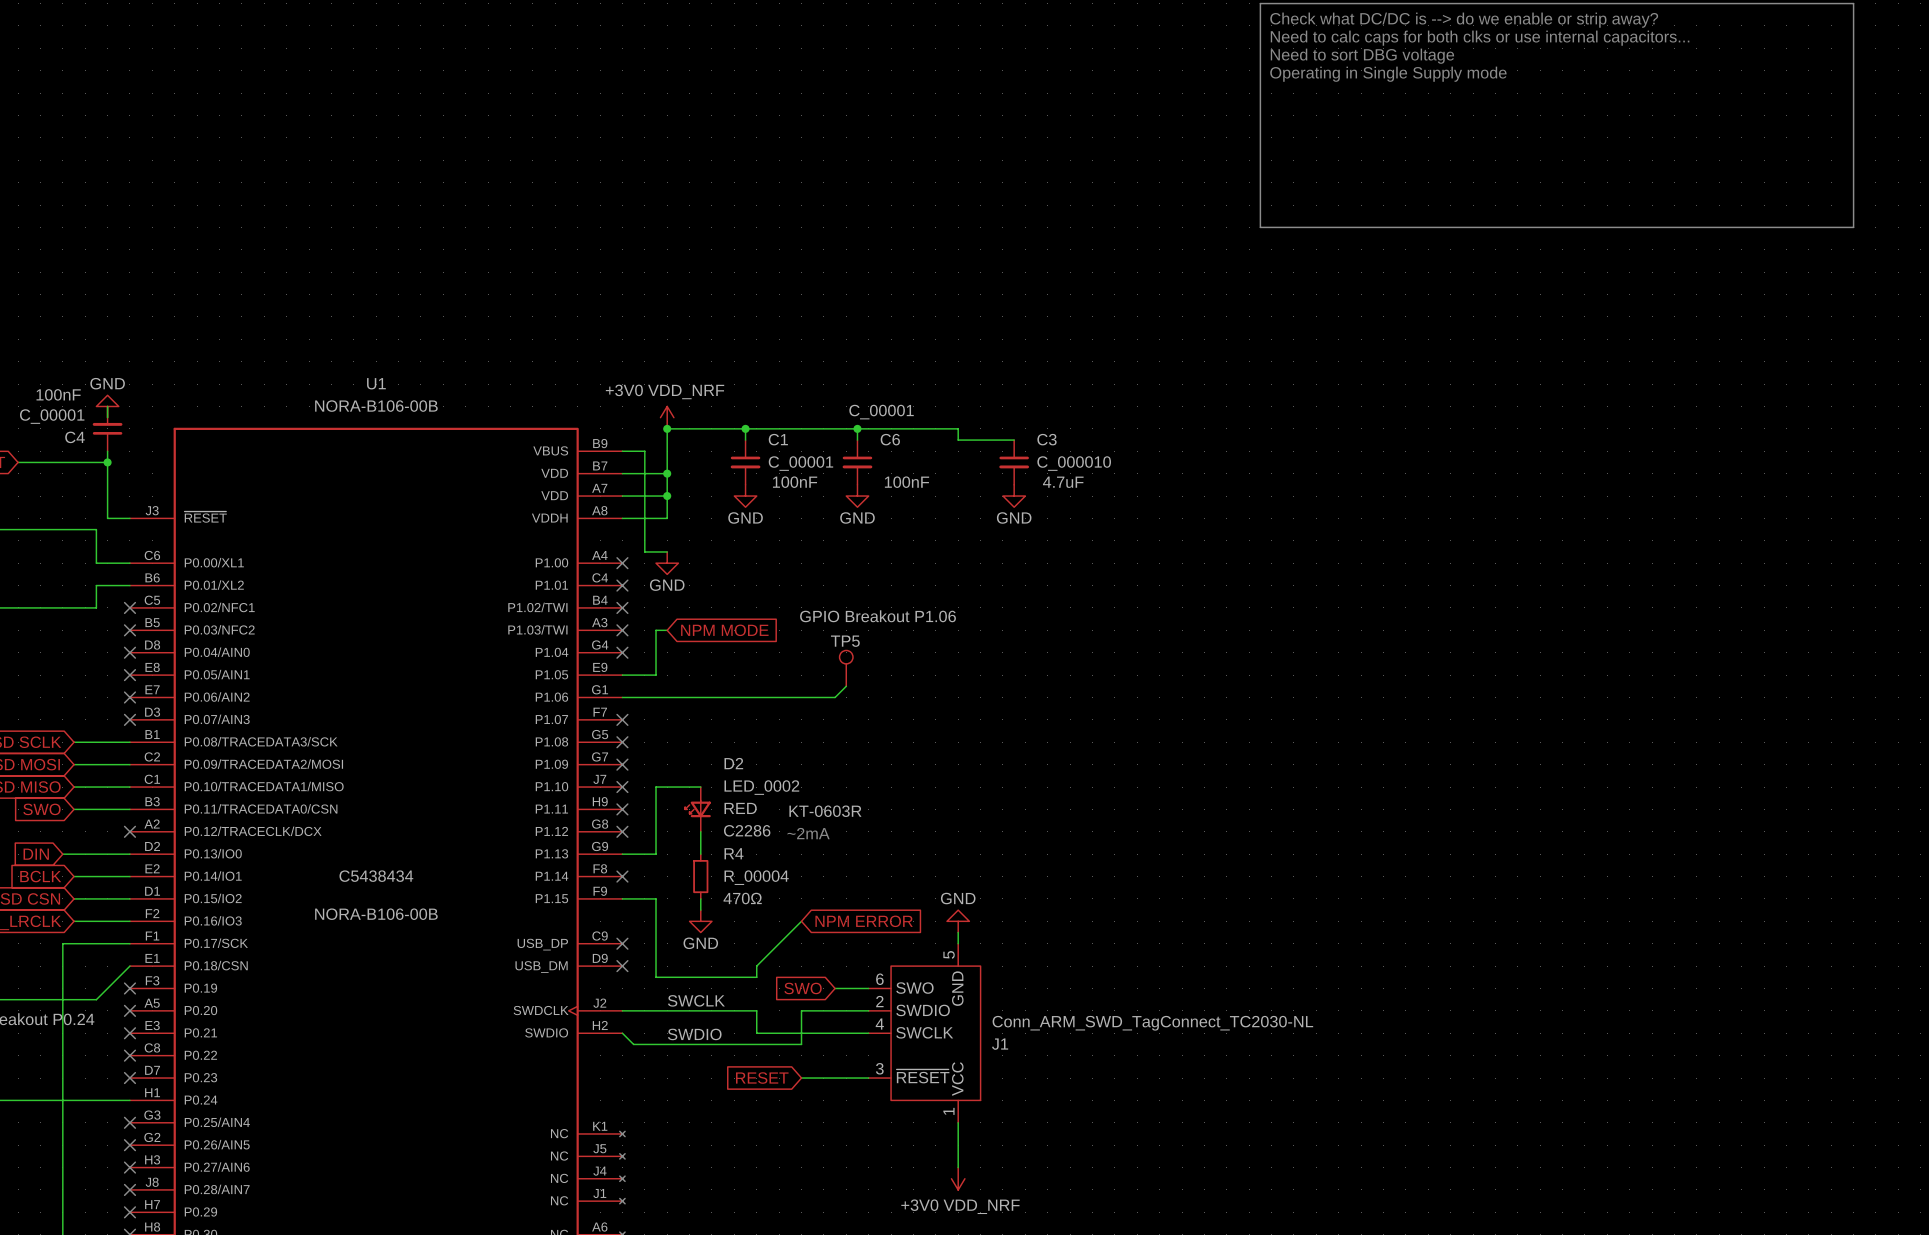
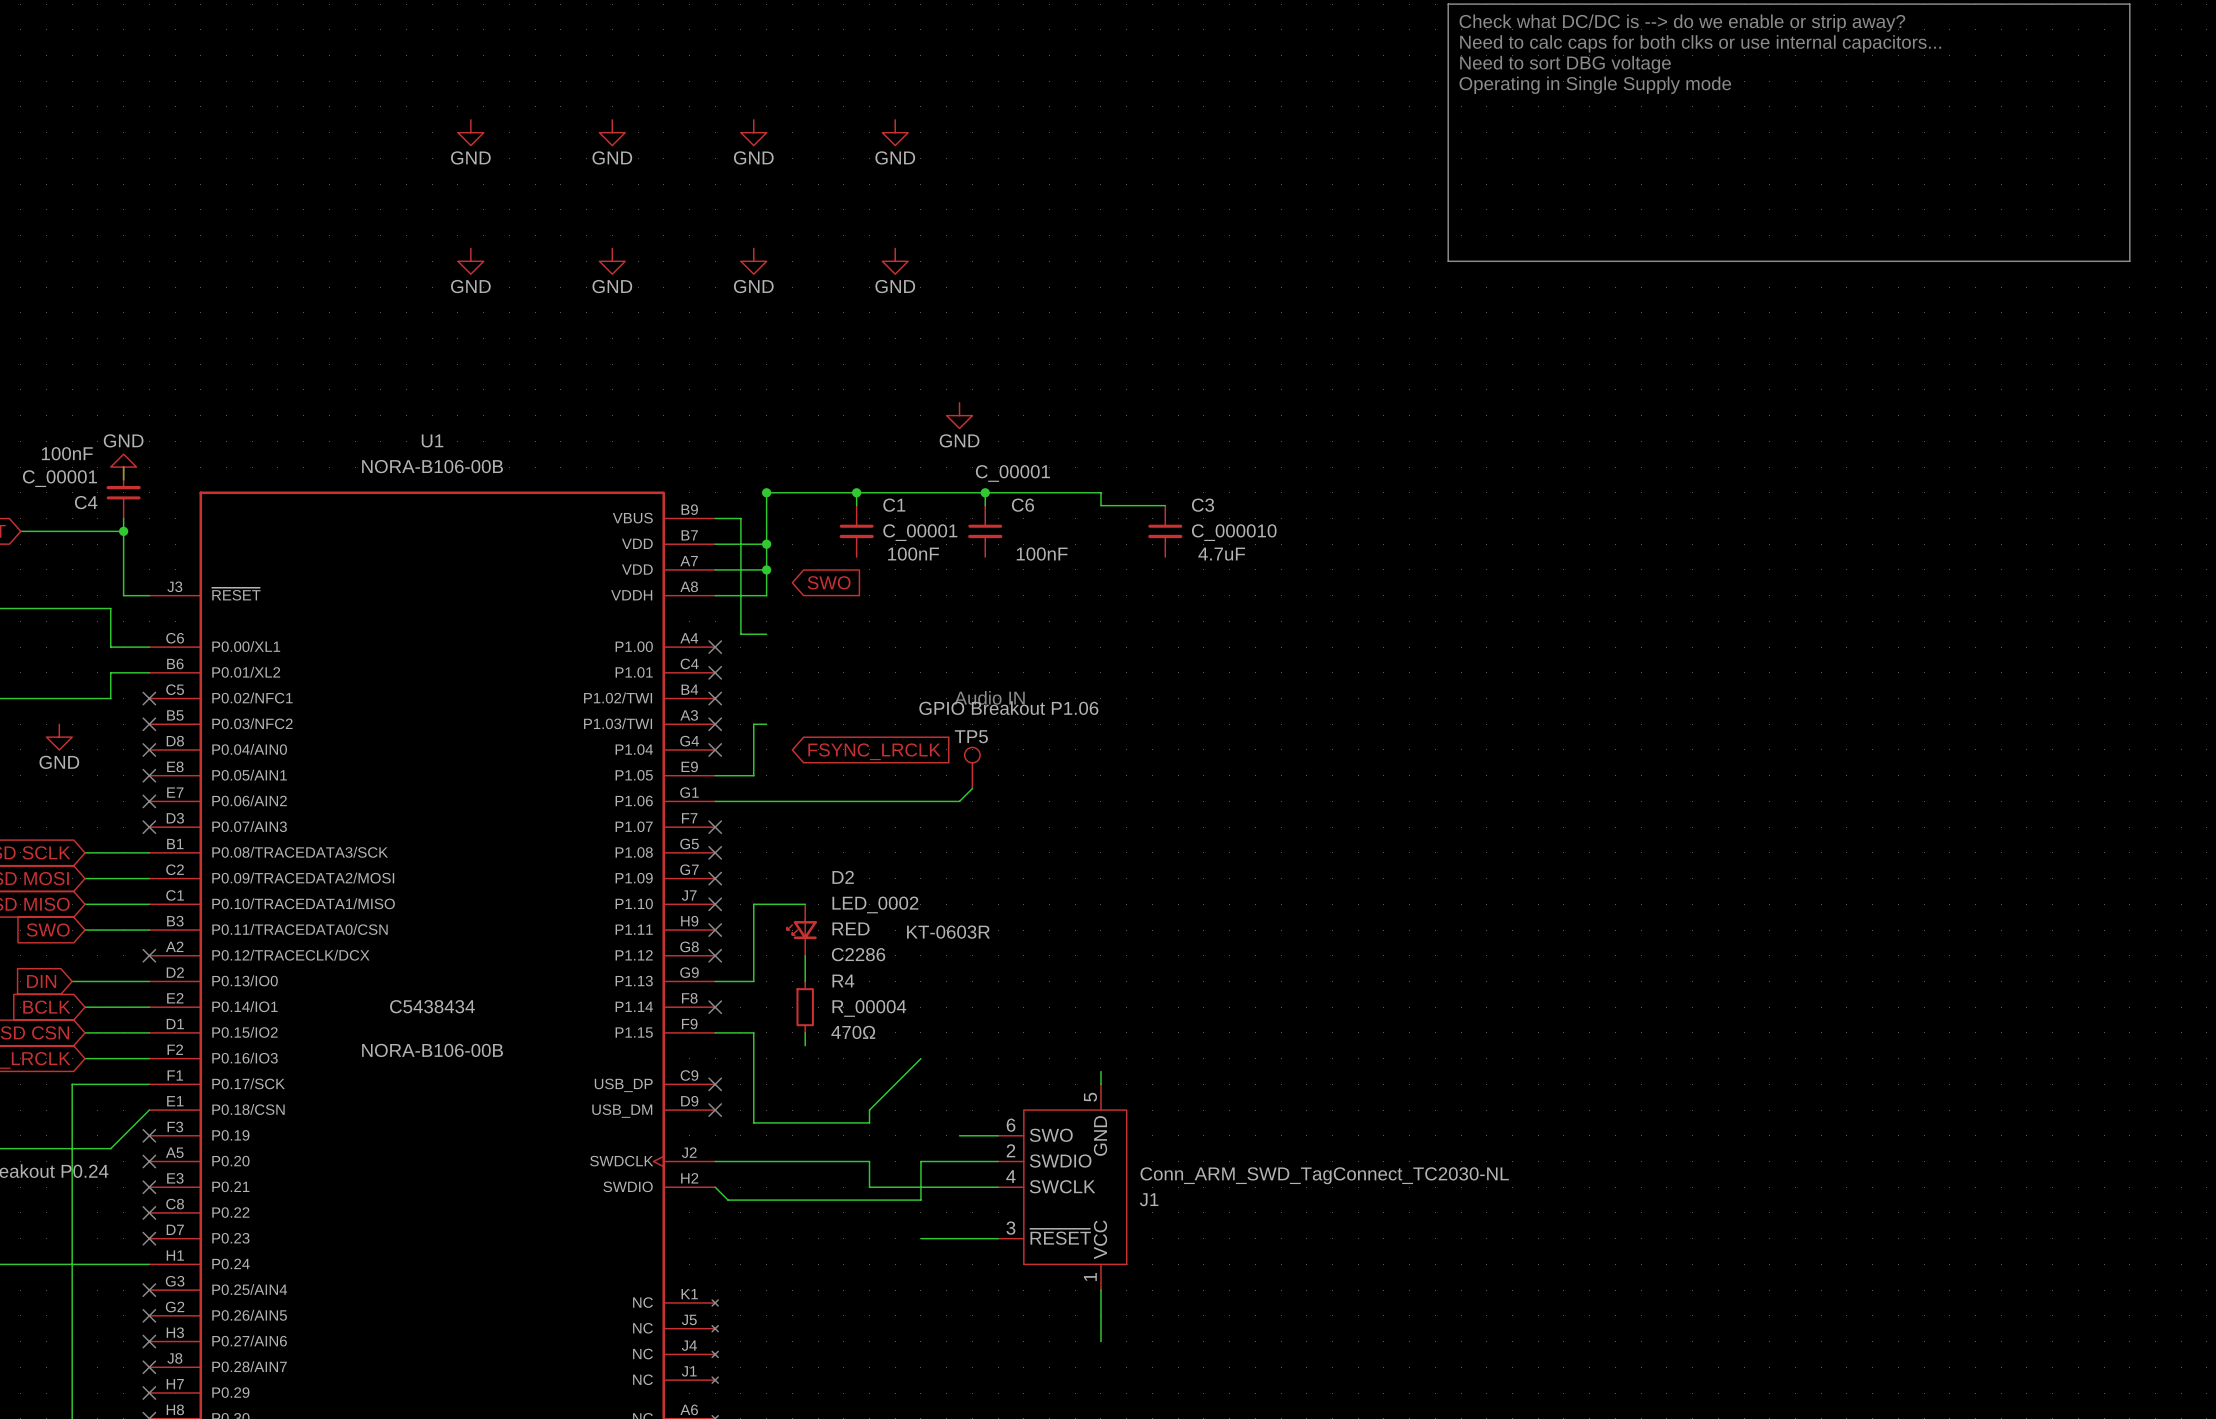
power symbol: none -> GND (470, 132)
power symbol: none -> GND (612, 132)
power symbol: none -> GND (753, 132)
power symbol: none -> GND (895, 132)
power symbol: none -> GND (470, 261)
power symbol: none -> GND (612, 261)
power symbol: none -> GND (753, 261)
power symbol: none -> GND (895, 261)
power symbol: none -> GND (959, 415)
power symbol: +3V0 VDD_NRF (667, 417) -> none
power symbol: GND (745, 496) -> none
power symbol: GND (857, 496) -> none
power symbol: GND (1014, 496) -> none
global label: none -> SWO (829, 582)
power symbol: GND (667, 563) -> none
text: none -> Audio IN (989, 697)
global label: NPM MODE (724, 630) -> none
power symbol: none -> GND (59, 737)
global label: none -> FSYNC_LRCLK (874, 751)
text: ~2mA (808, 833) -> none
power symbol: GND (700, 921) -> none
global label: NPM ERROR (864, 921) -> none
power symbol: GND (958, 921) -> none
global label: SWO (803, 988) -> none
label: SWCLK (696, 1000) -> none
label: SWDIO (694, 1034) -> none
global label: RESET (762, 1078) -> none
power symbol: +3V0 VDD_NRF (958, 1178) -> none

